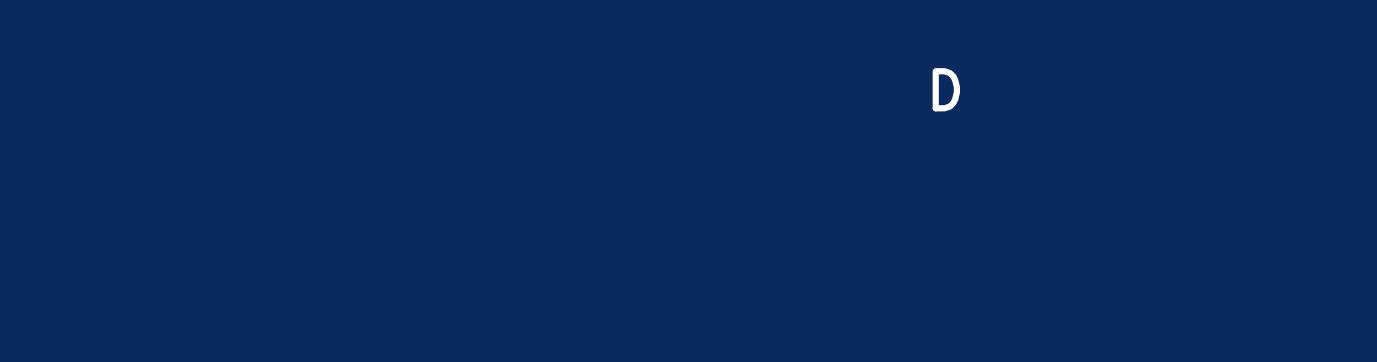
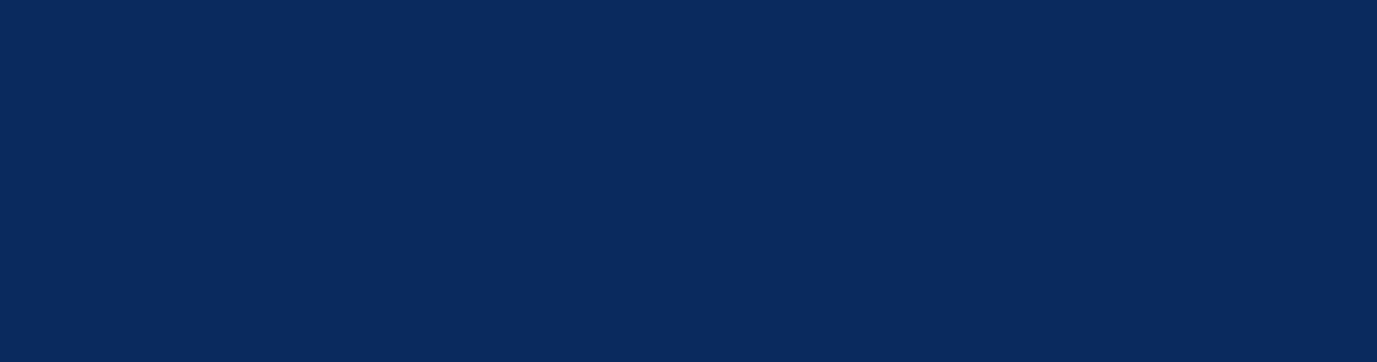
text: D (946, 89) -> none

